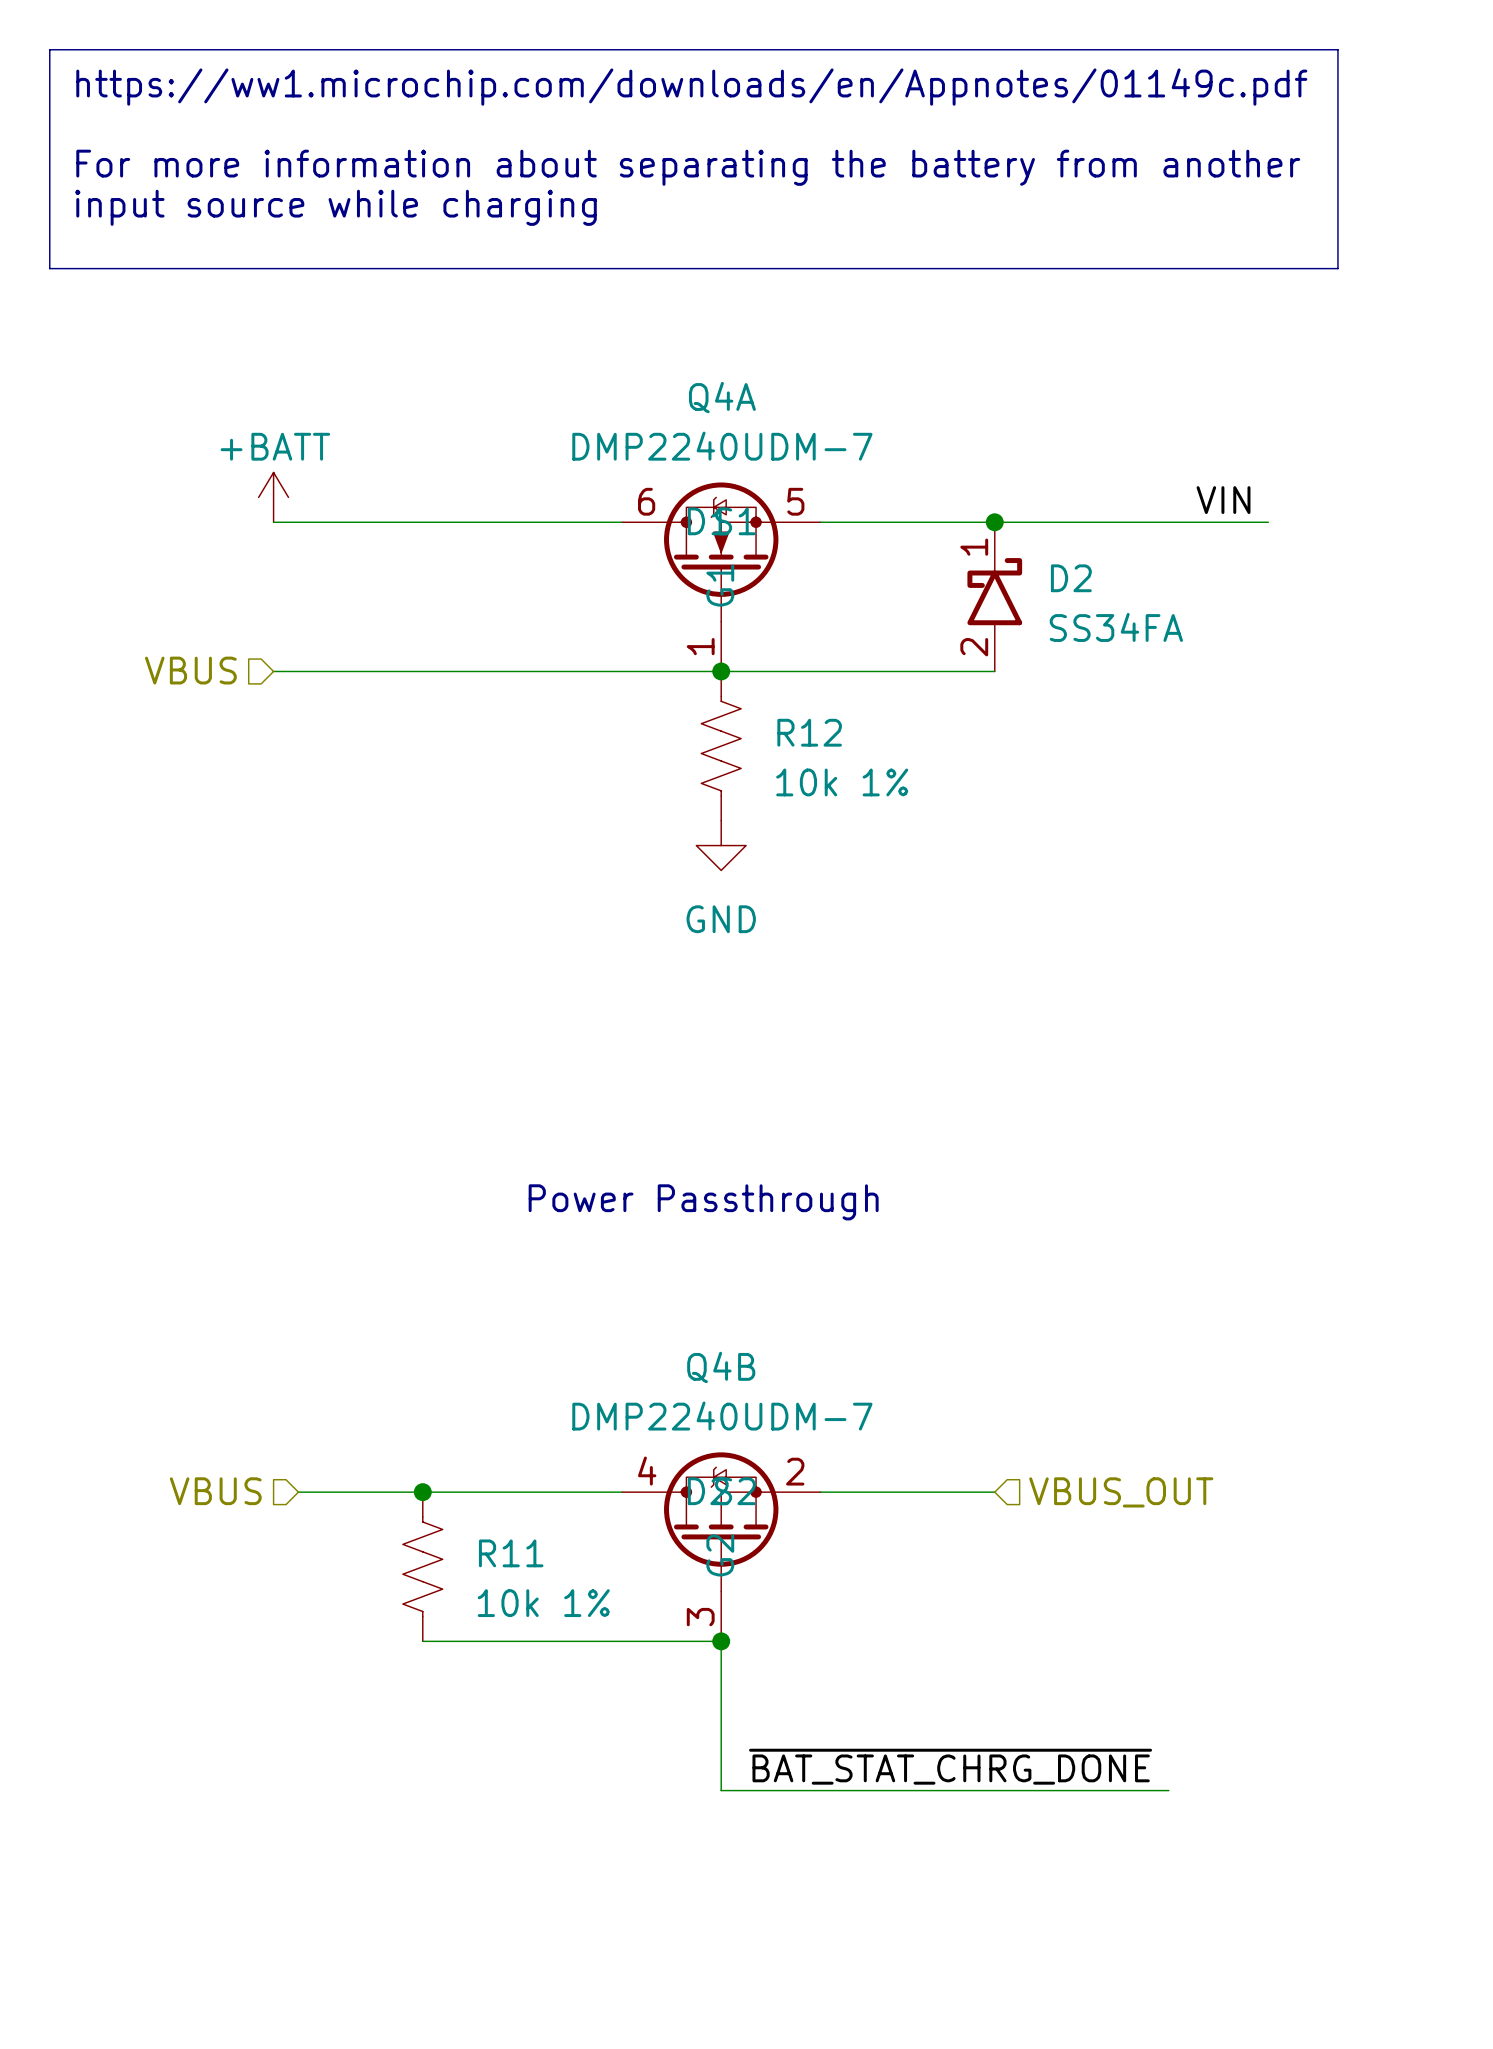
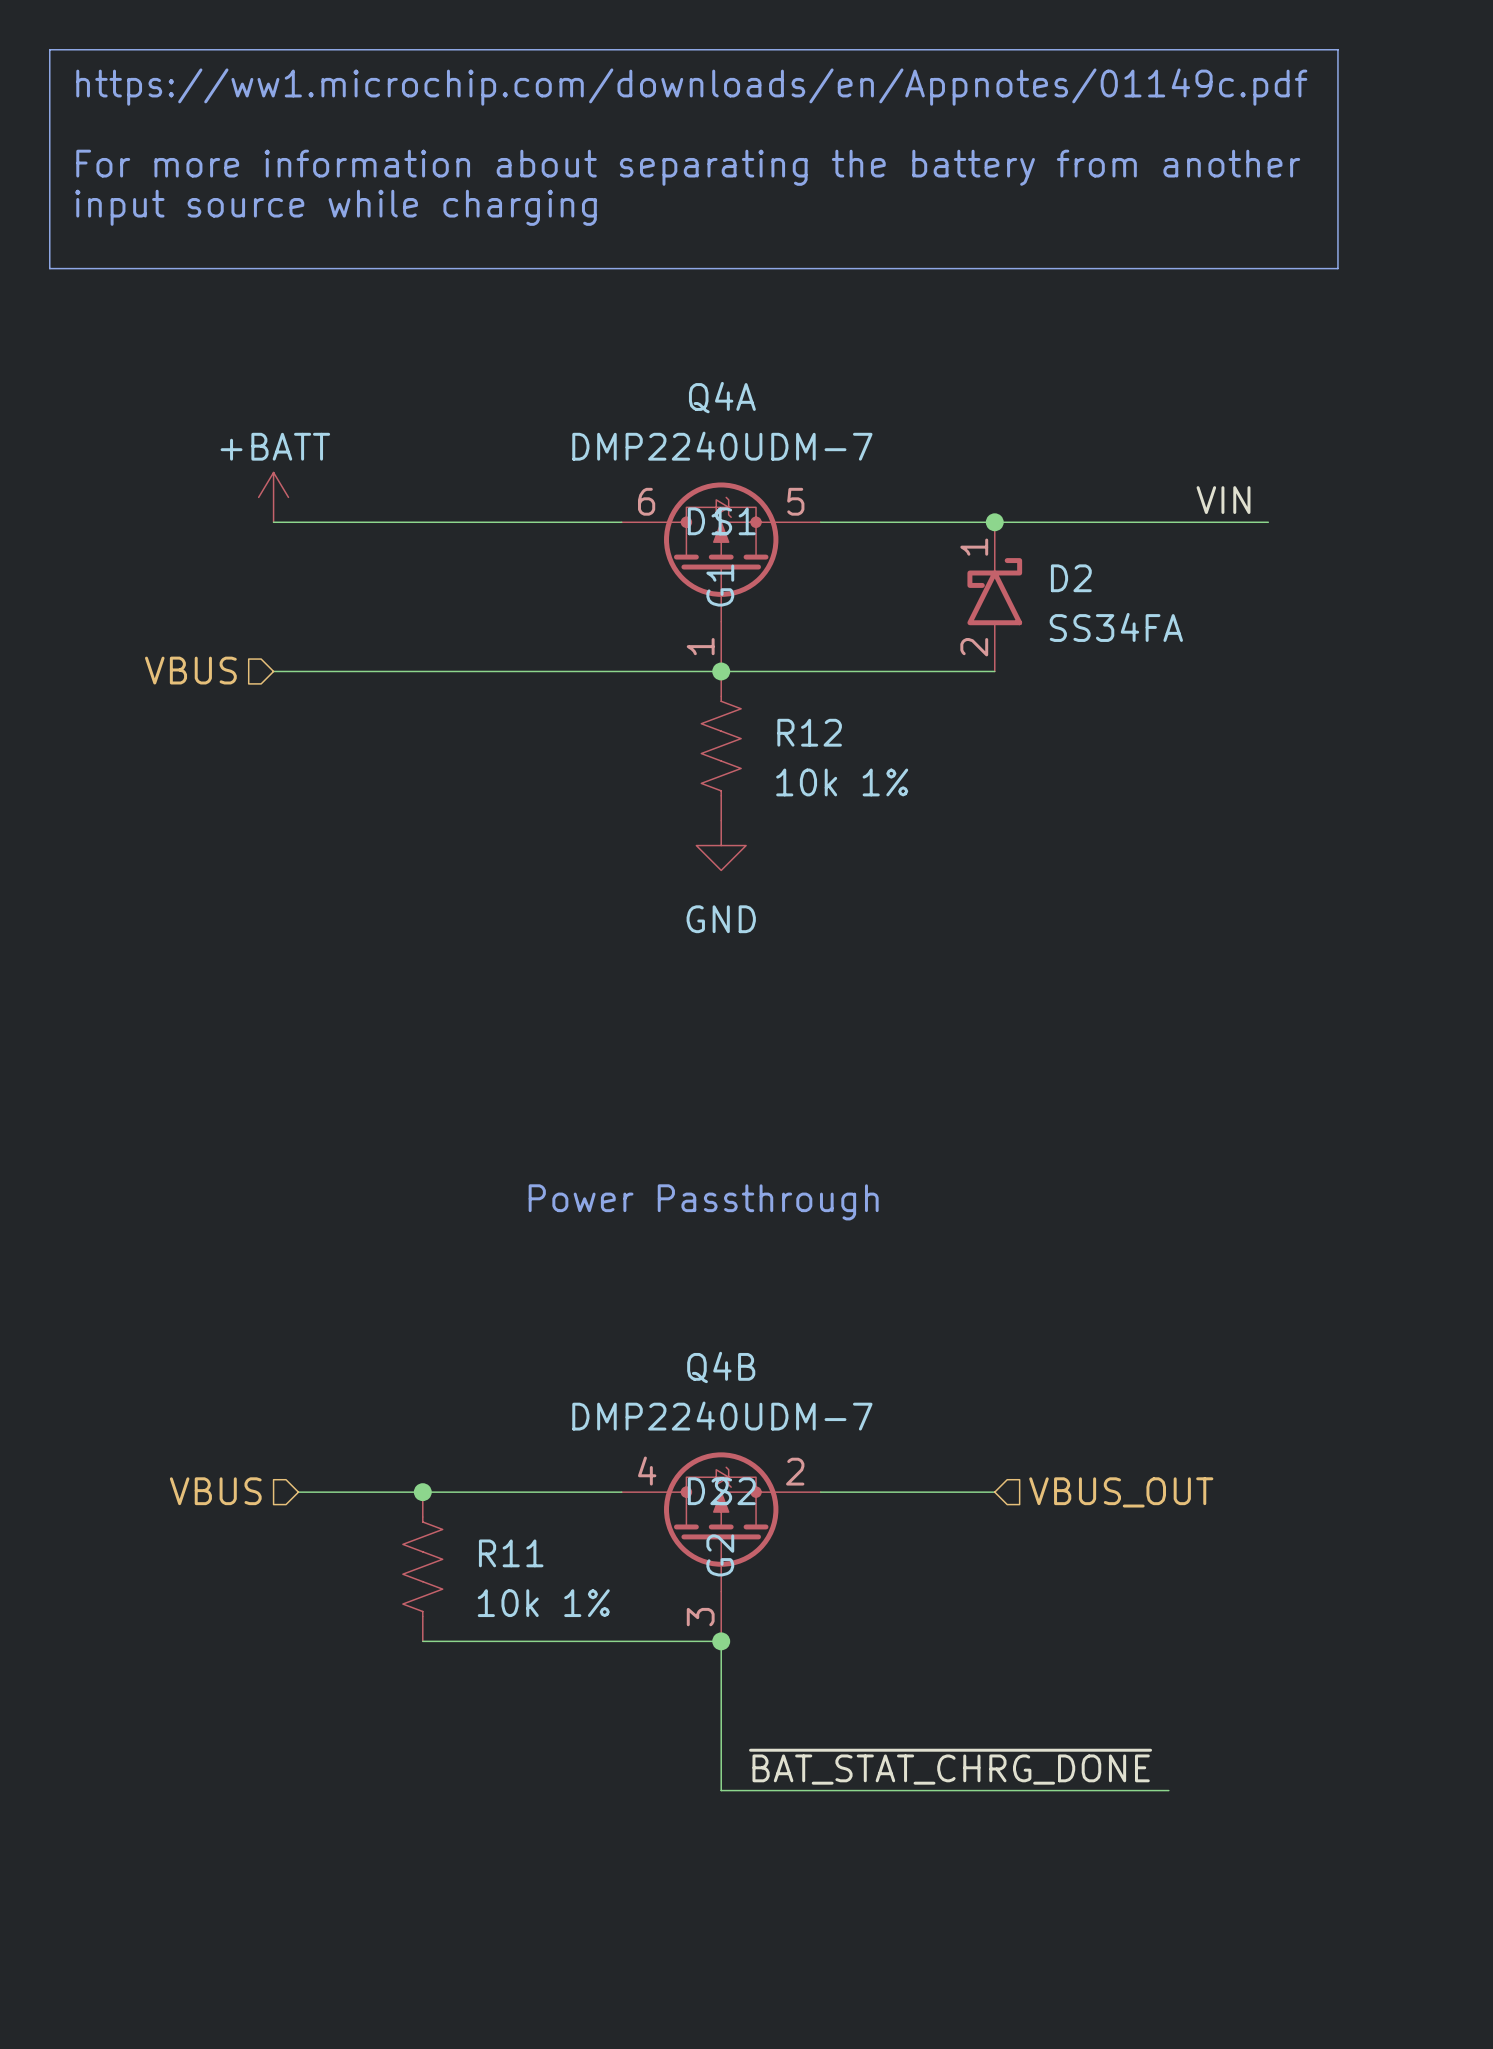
Q4A symbol: [621, 482, 821, 672] -> [621, 482, 821, 672]
Q4B symbol: [621, 1452, 821, 1642] -> [621, 1452, 821, 1642]

